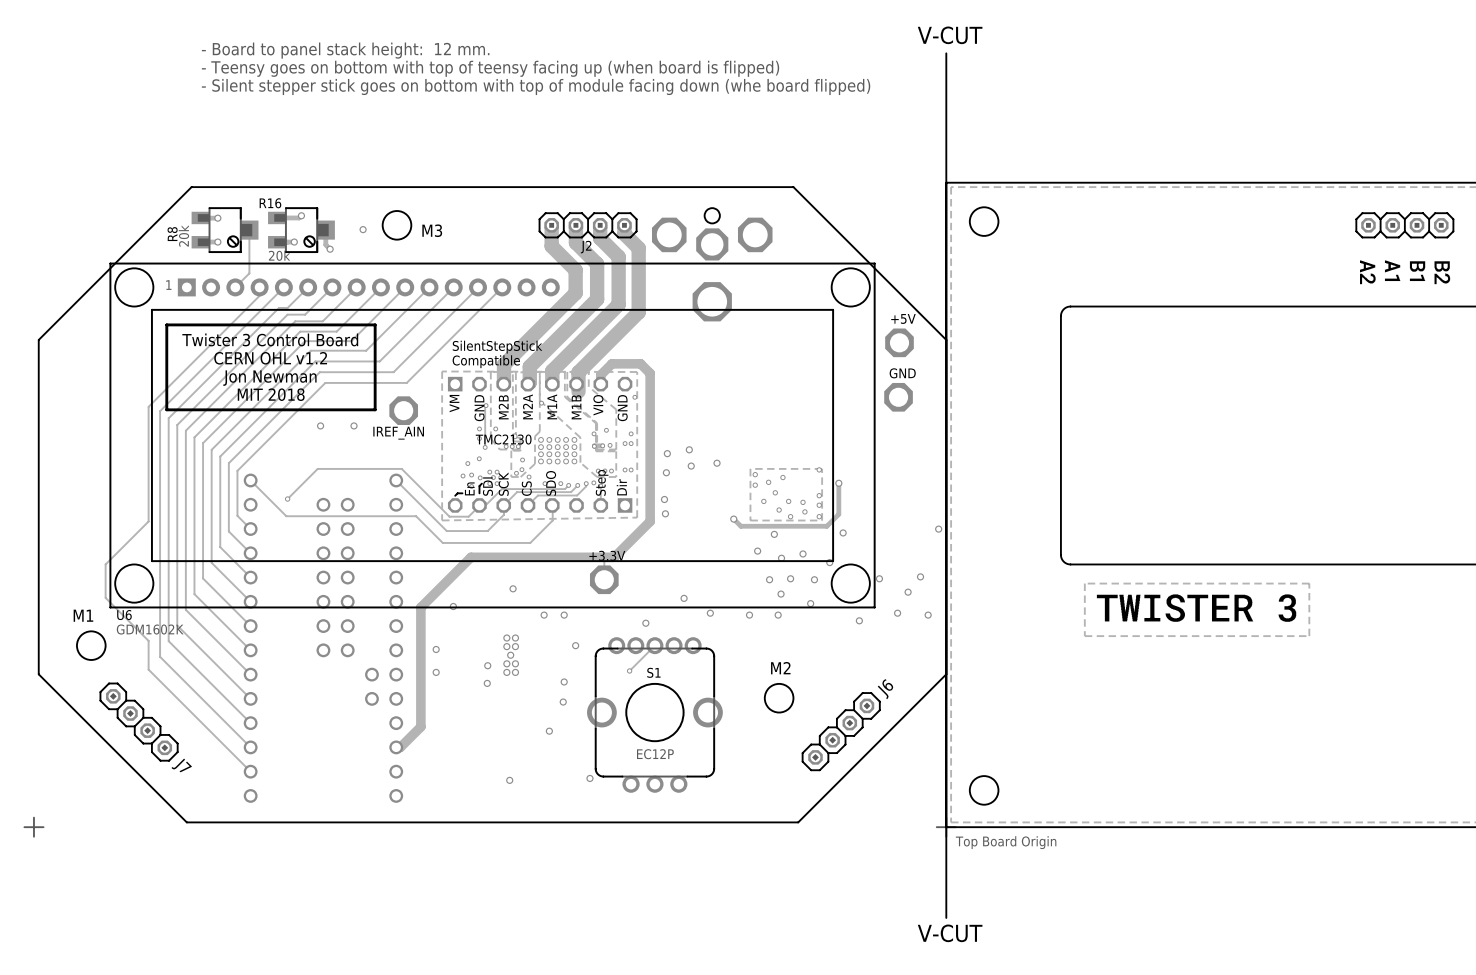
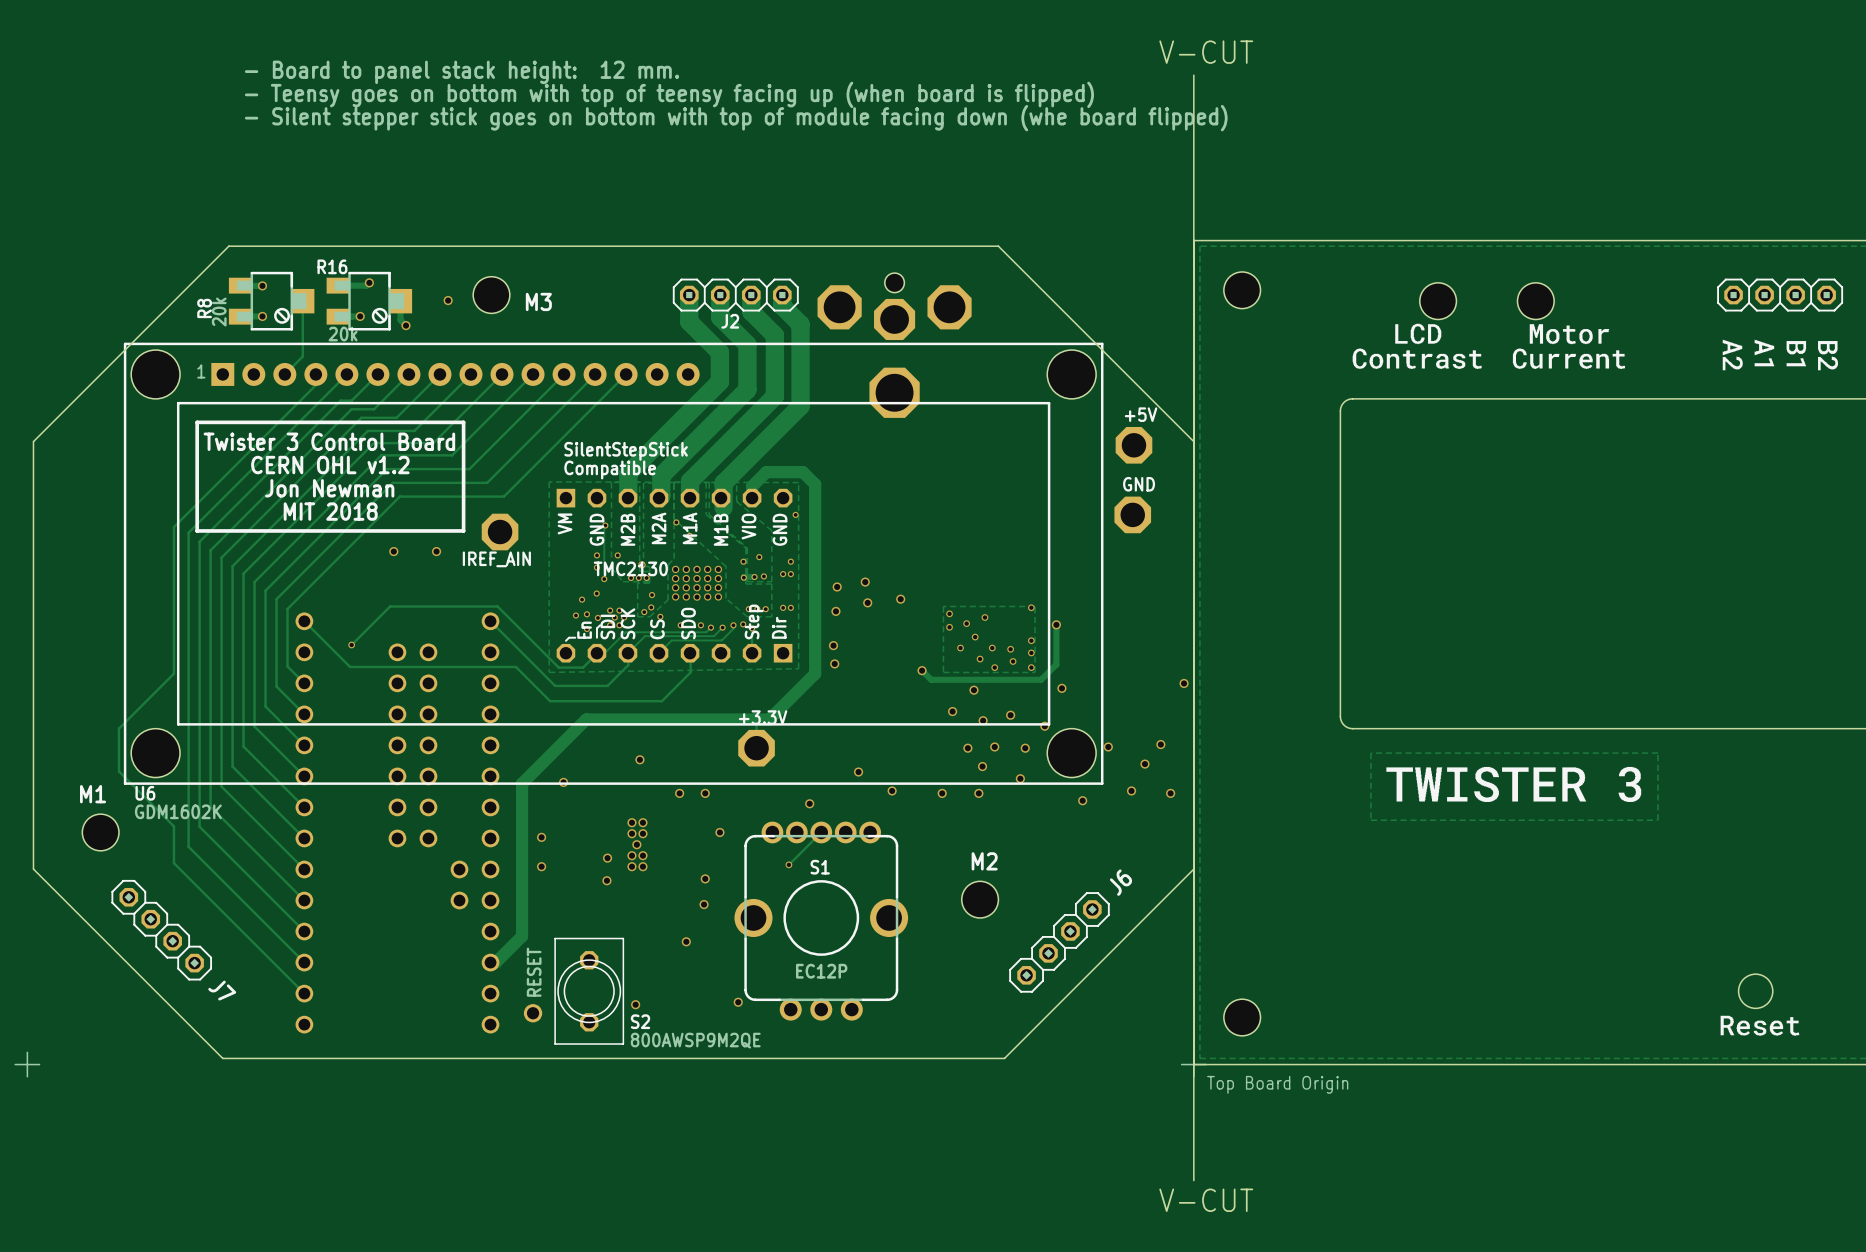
hole: none -> (1438, 301)
hole: none -> (1535, 301)
drawing: none -> [1352, 323, 1482, 369]
drawing: none -> [1512, 324, 1626, 369]
round board edge: none -> [1738, 973, 1774, 1009]
S2: none -> 800AWSP9M2QE (589, 991)
part: none -> RESET (533, 1013)
drawing: none -> [1720, 1015, 1800, 1036]

